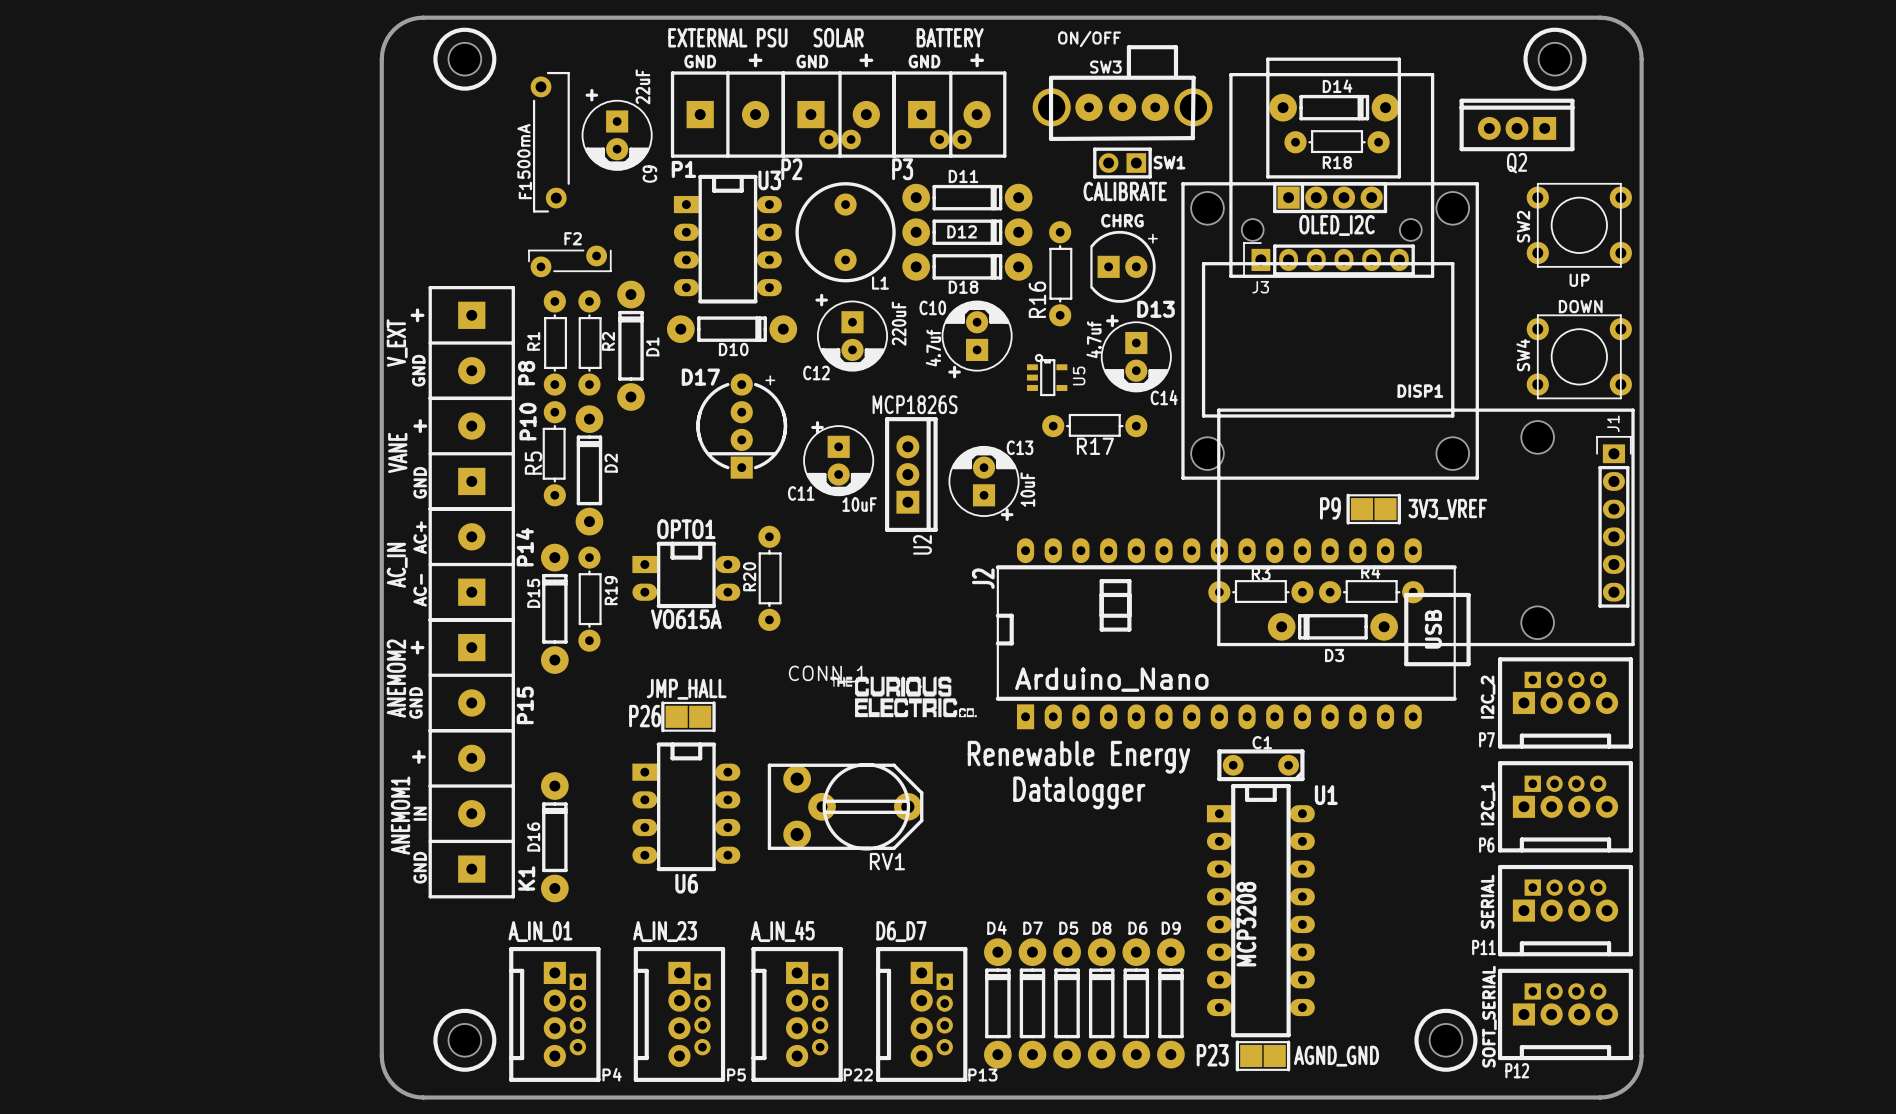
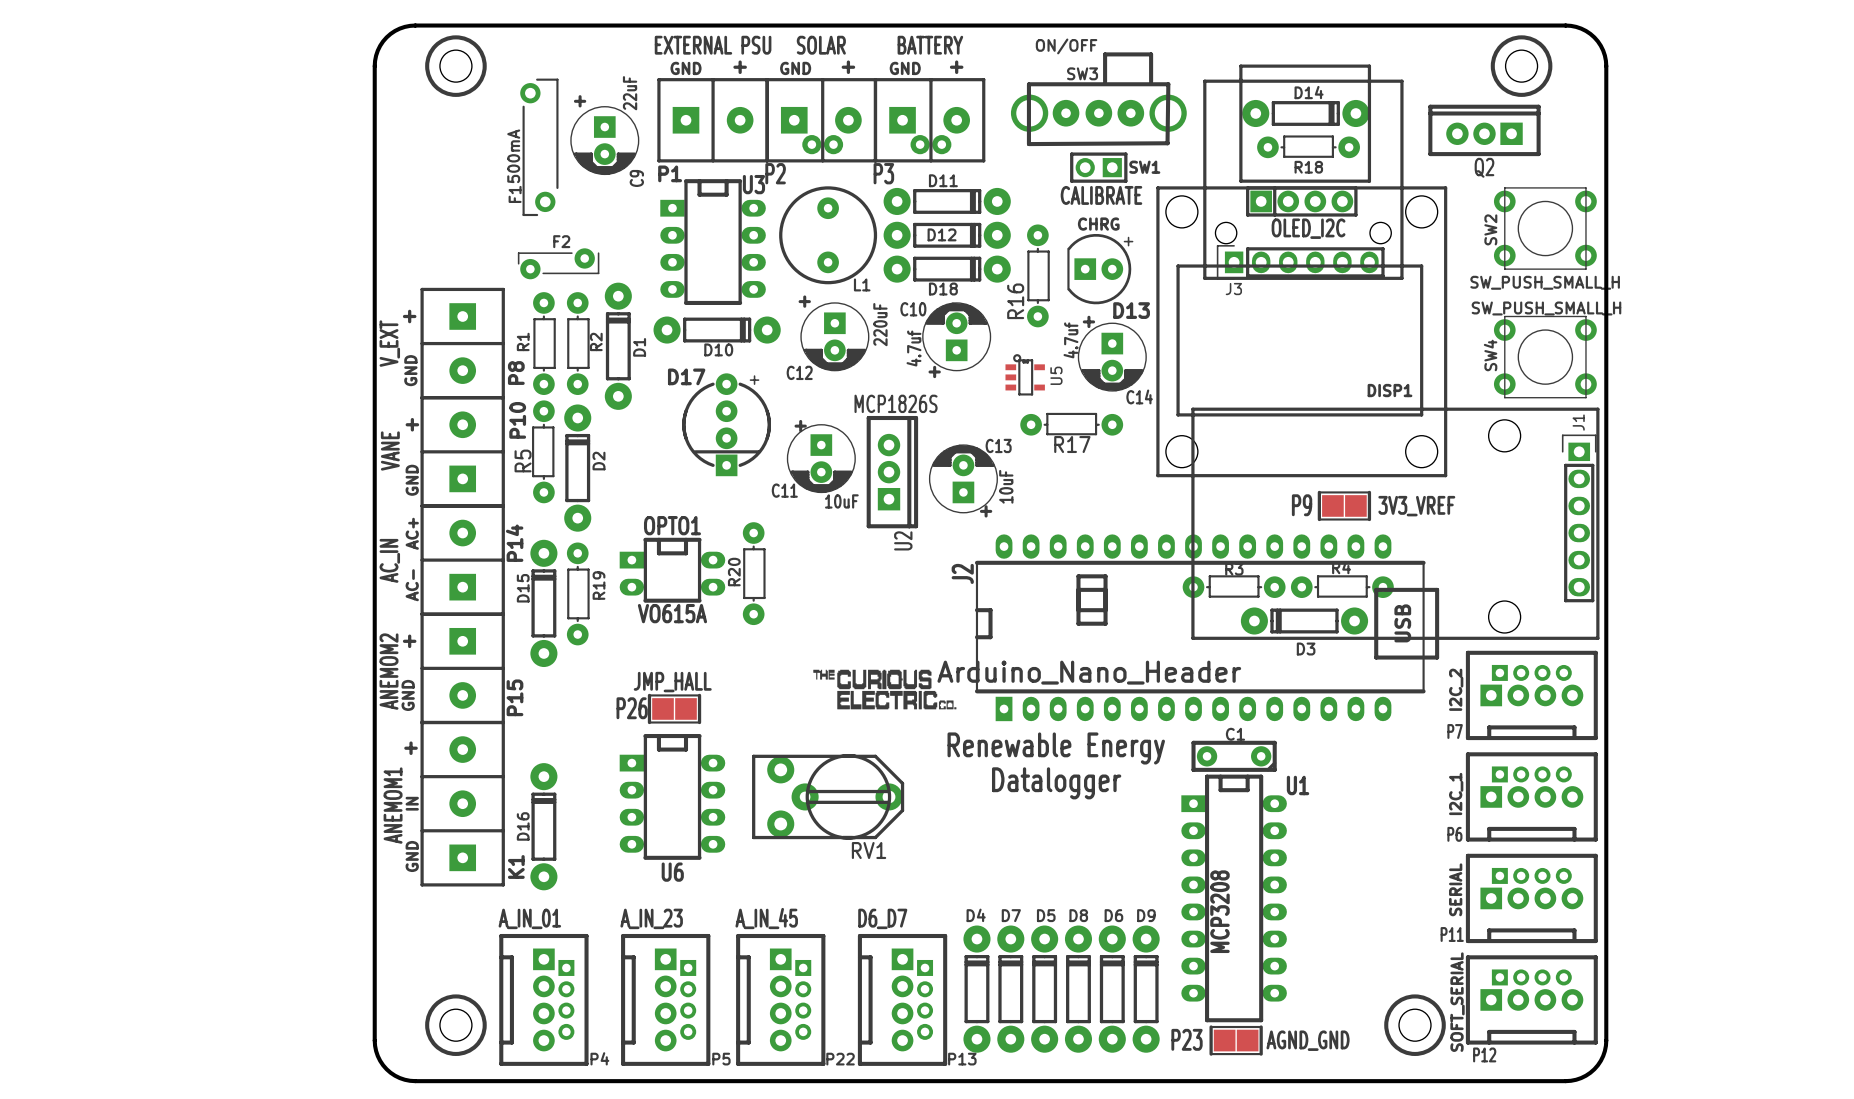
SW2 value: UP (1579, 280) -> SW_PUSH_SMALL_H (1545, 282)
SW4 value: DOWN (1580, 306) -> SW_PUSH_SMALL_H (1546, 308)
drawing shape: [788, 665, 977, 718] -> [813, 669, 957, 710]
J2 value: Arduino_Nano (1111, 679) -> Arduino_Nano_Header (1089, 672)

